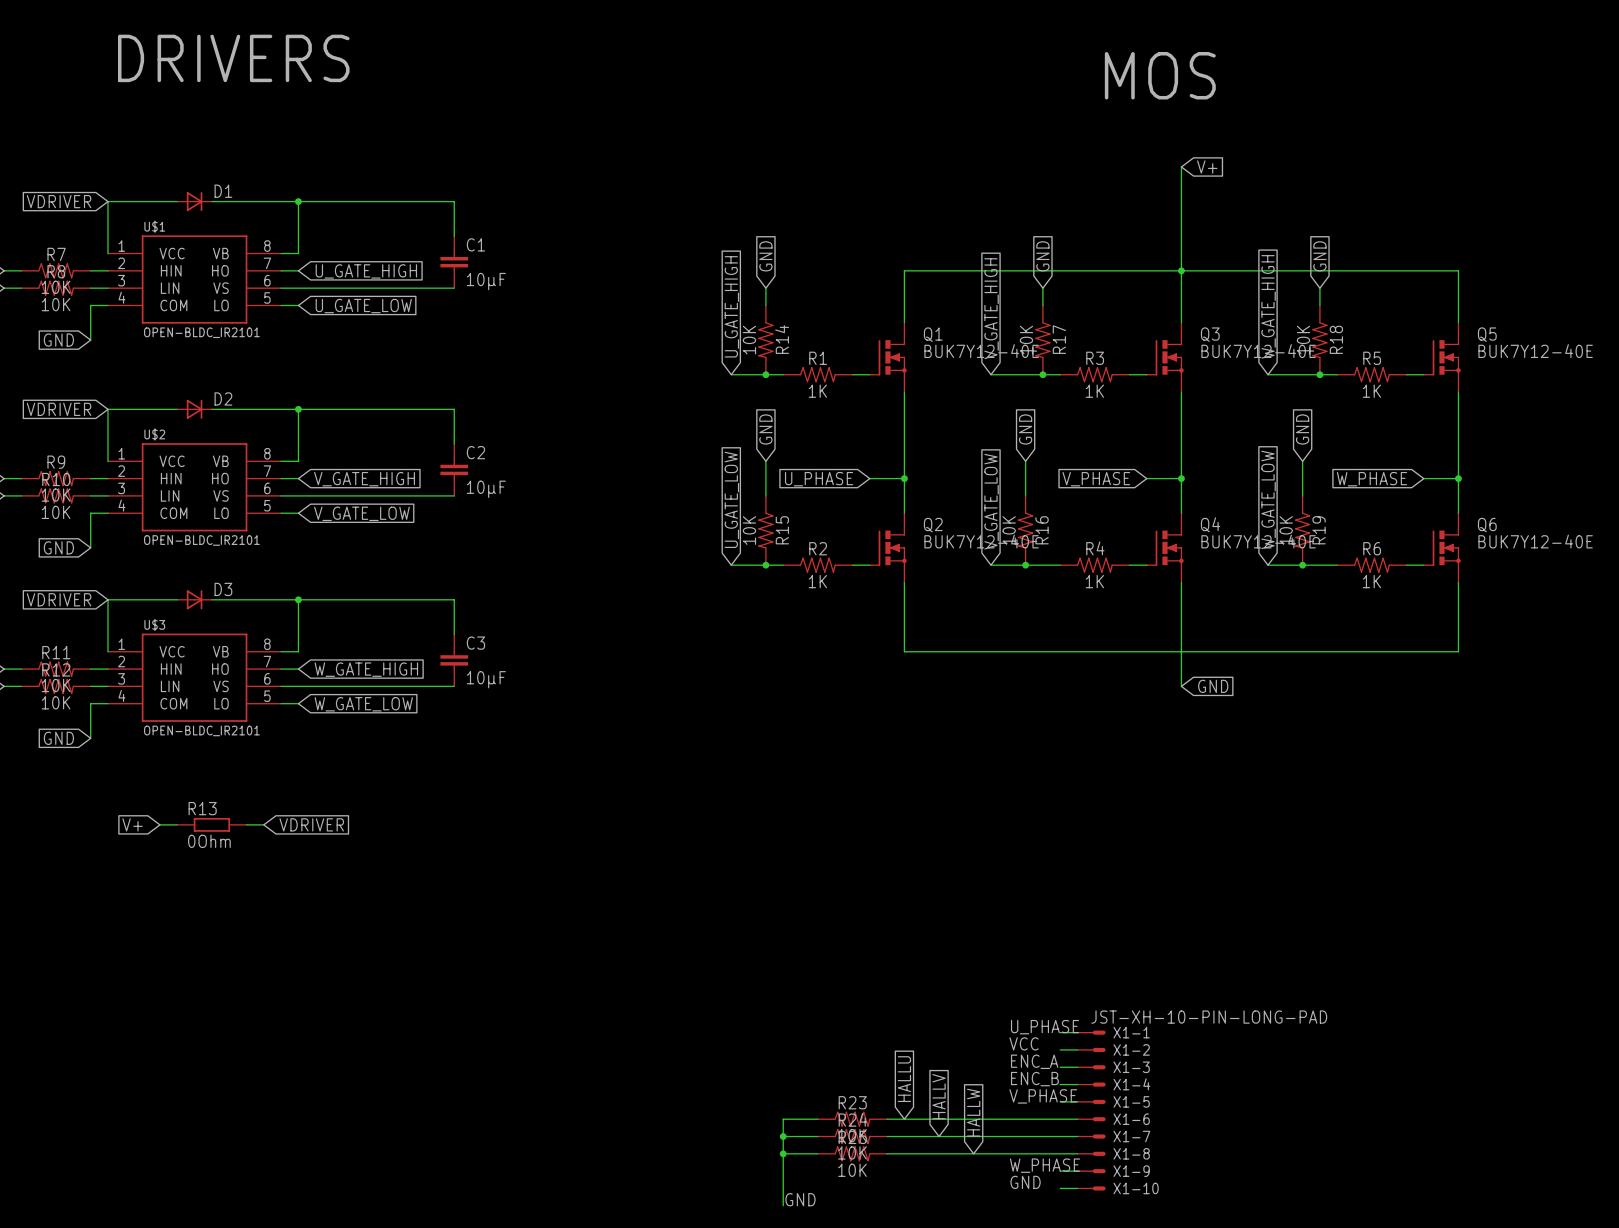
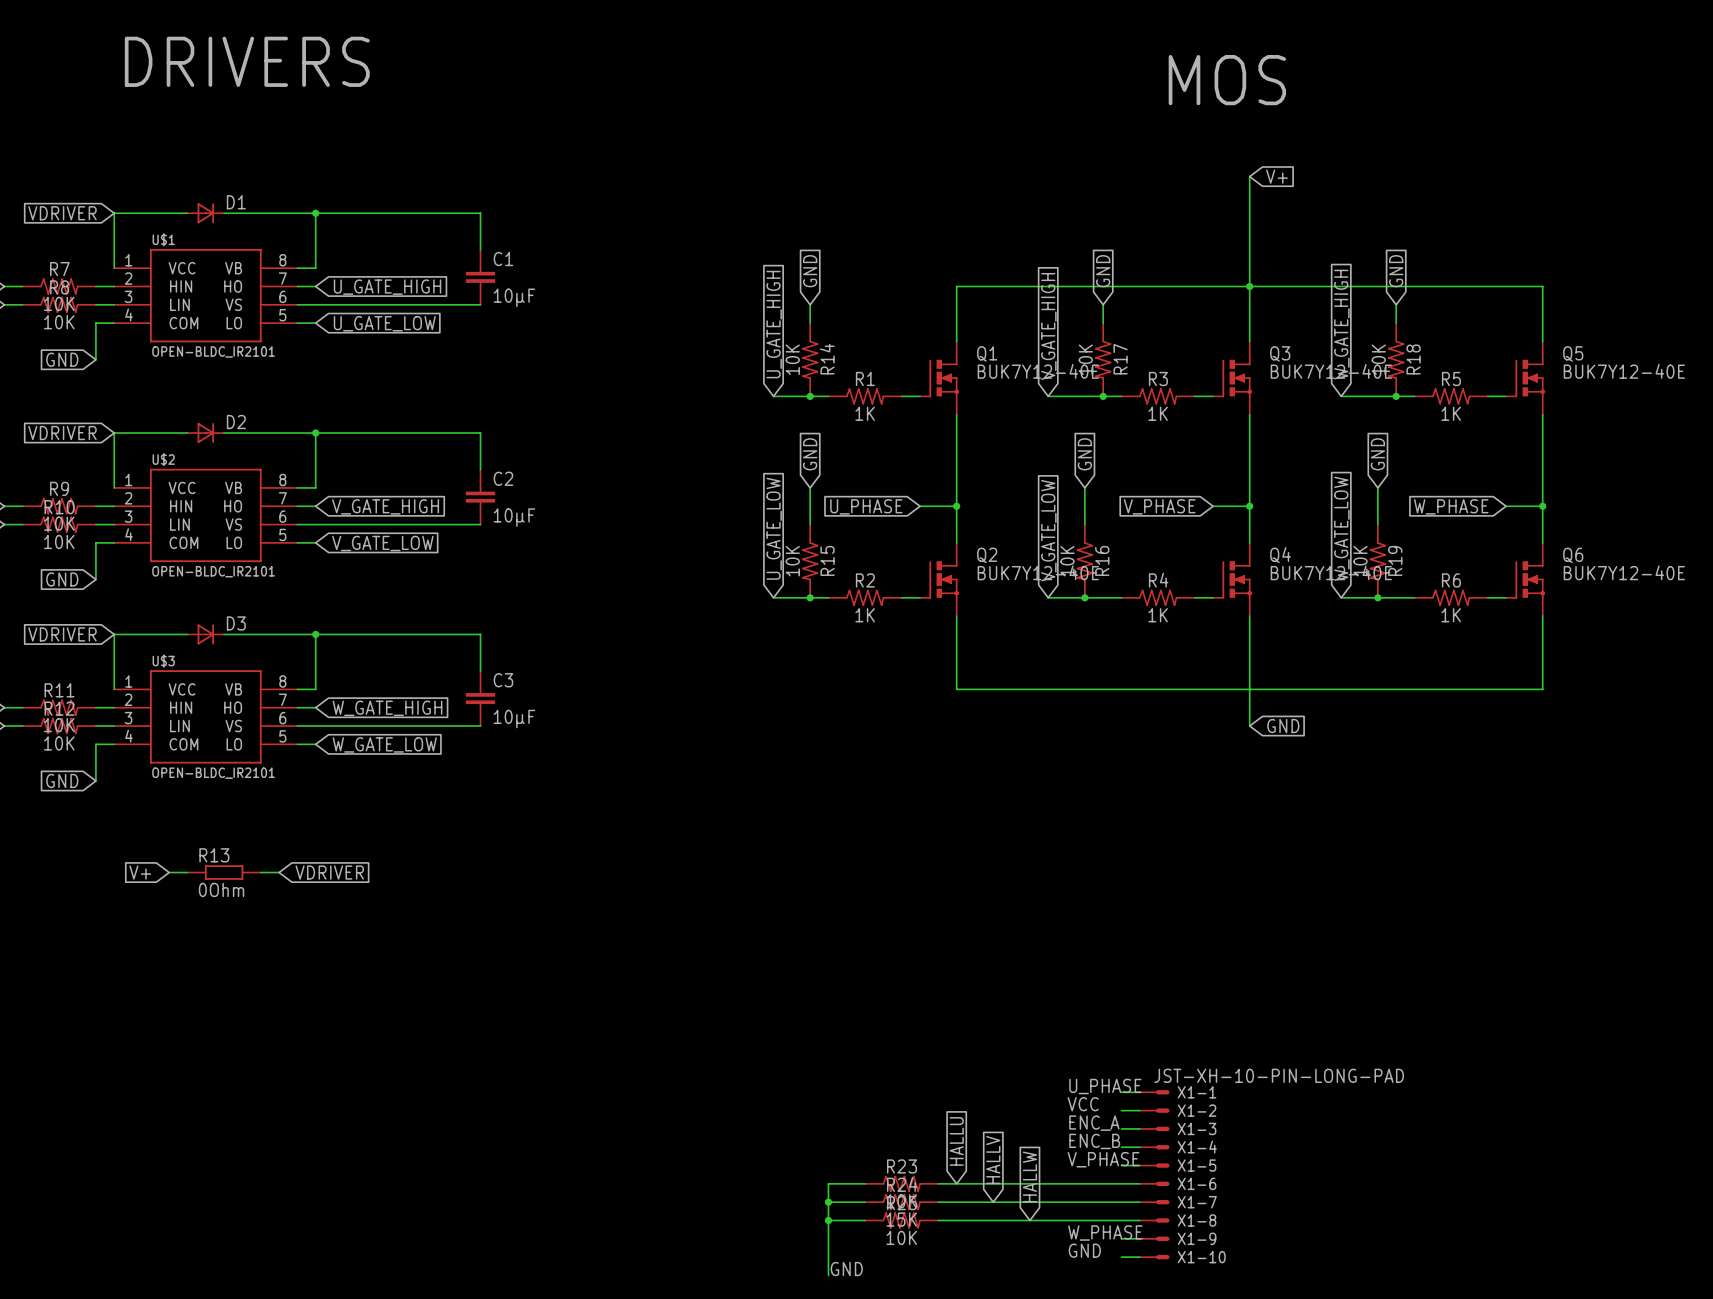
R24 value: 10K (852, 1152) -> 15K (901, 1219)

